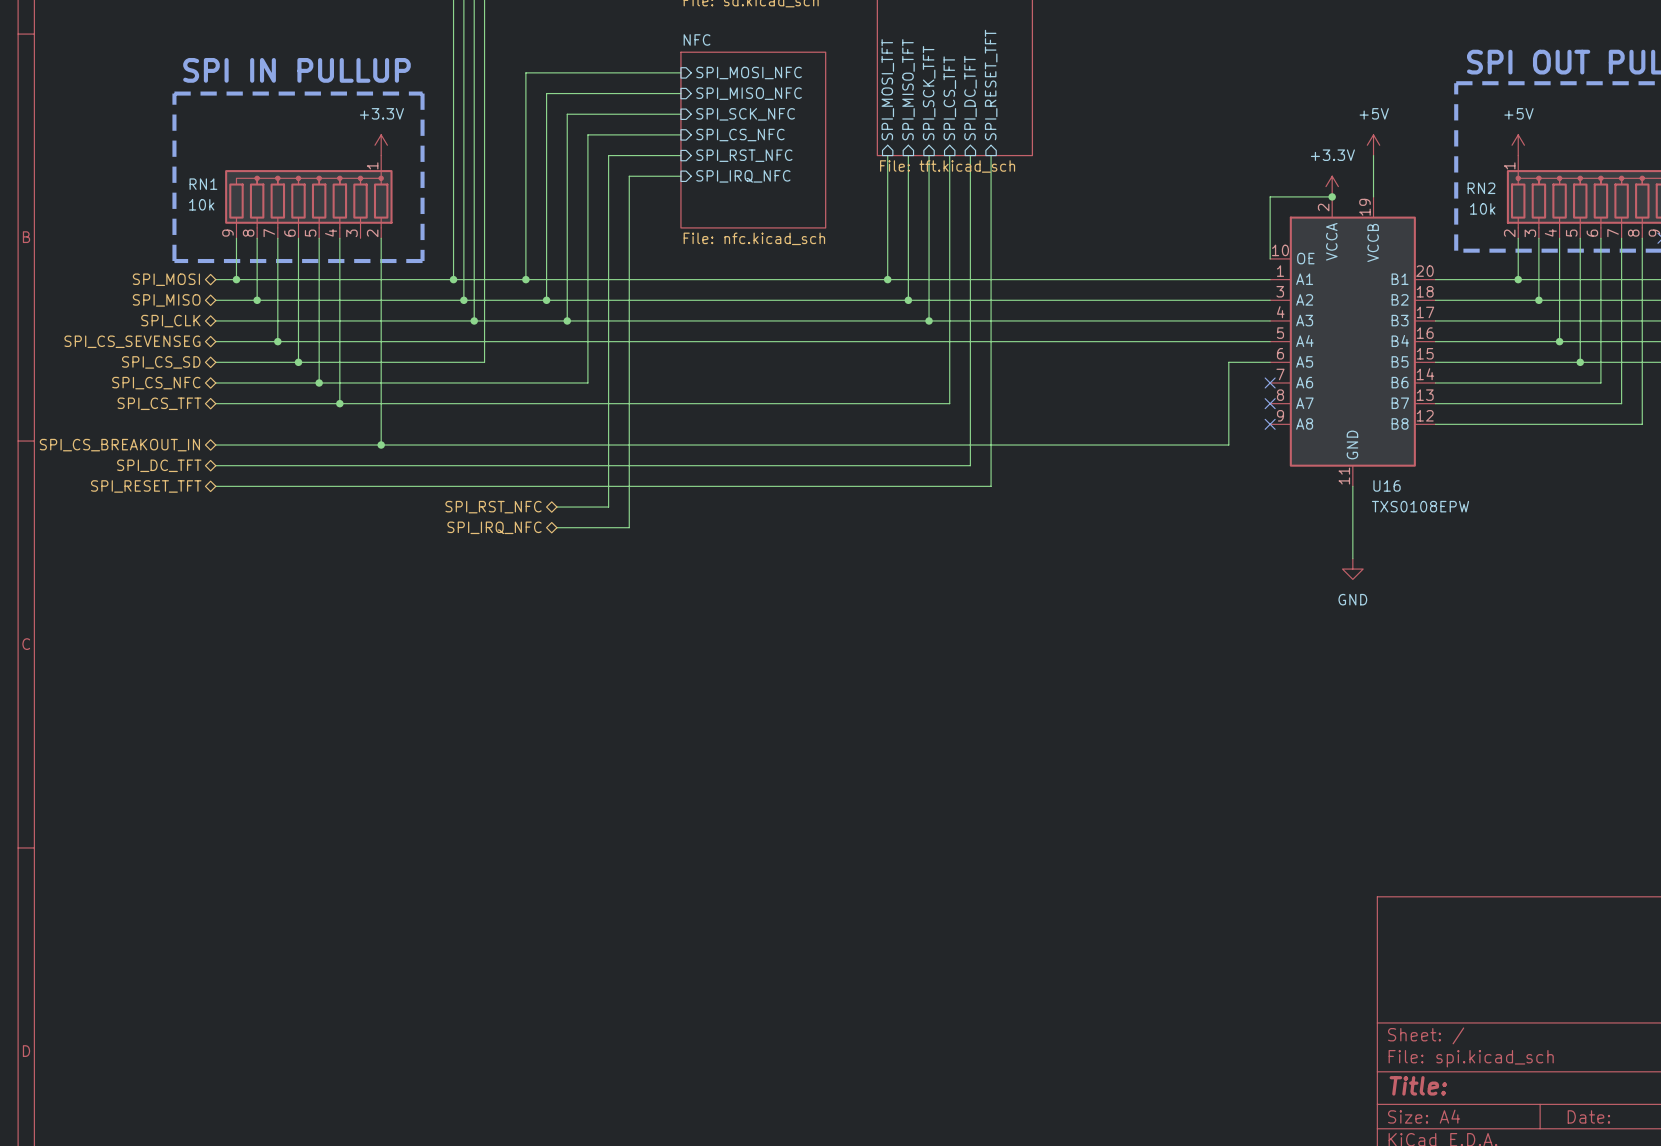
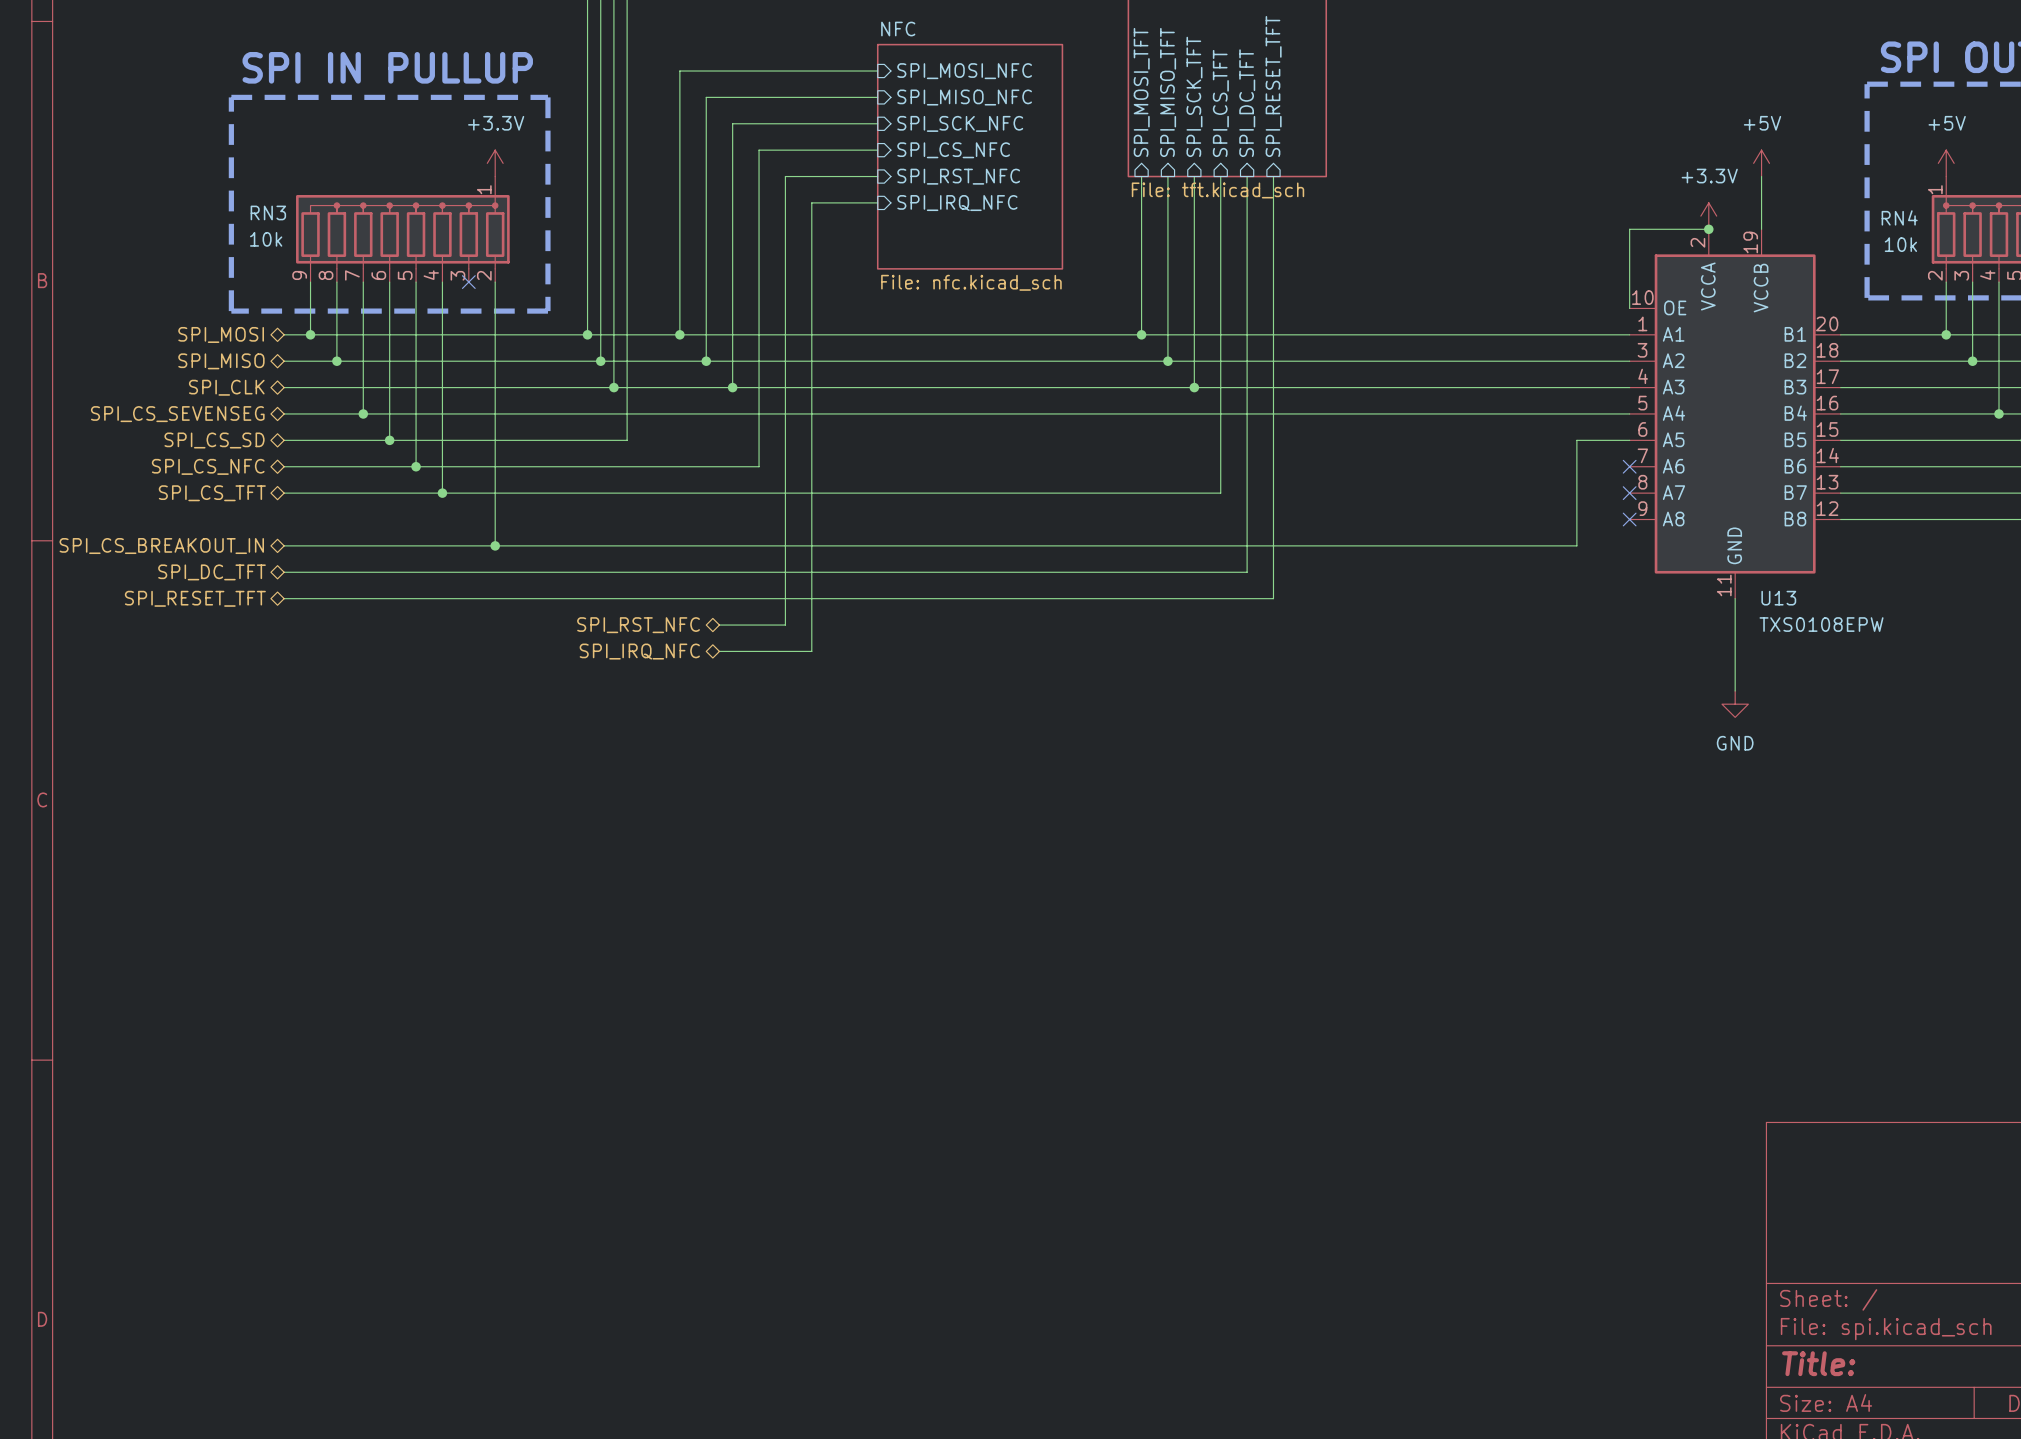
RN1 name: RN1 (203, 184) -> RN3 (268, 212)
RN2 name: RN2 (1481, 188) -> RN4 (1899, 217)
no-connect mark: none -> (468, 282)
U16 name: U16 (1387, 485) -> U13 (1778, 598)

